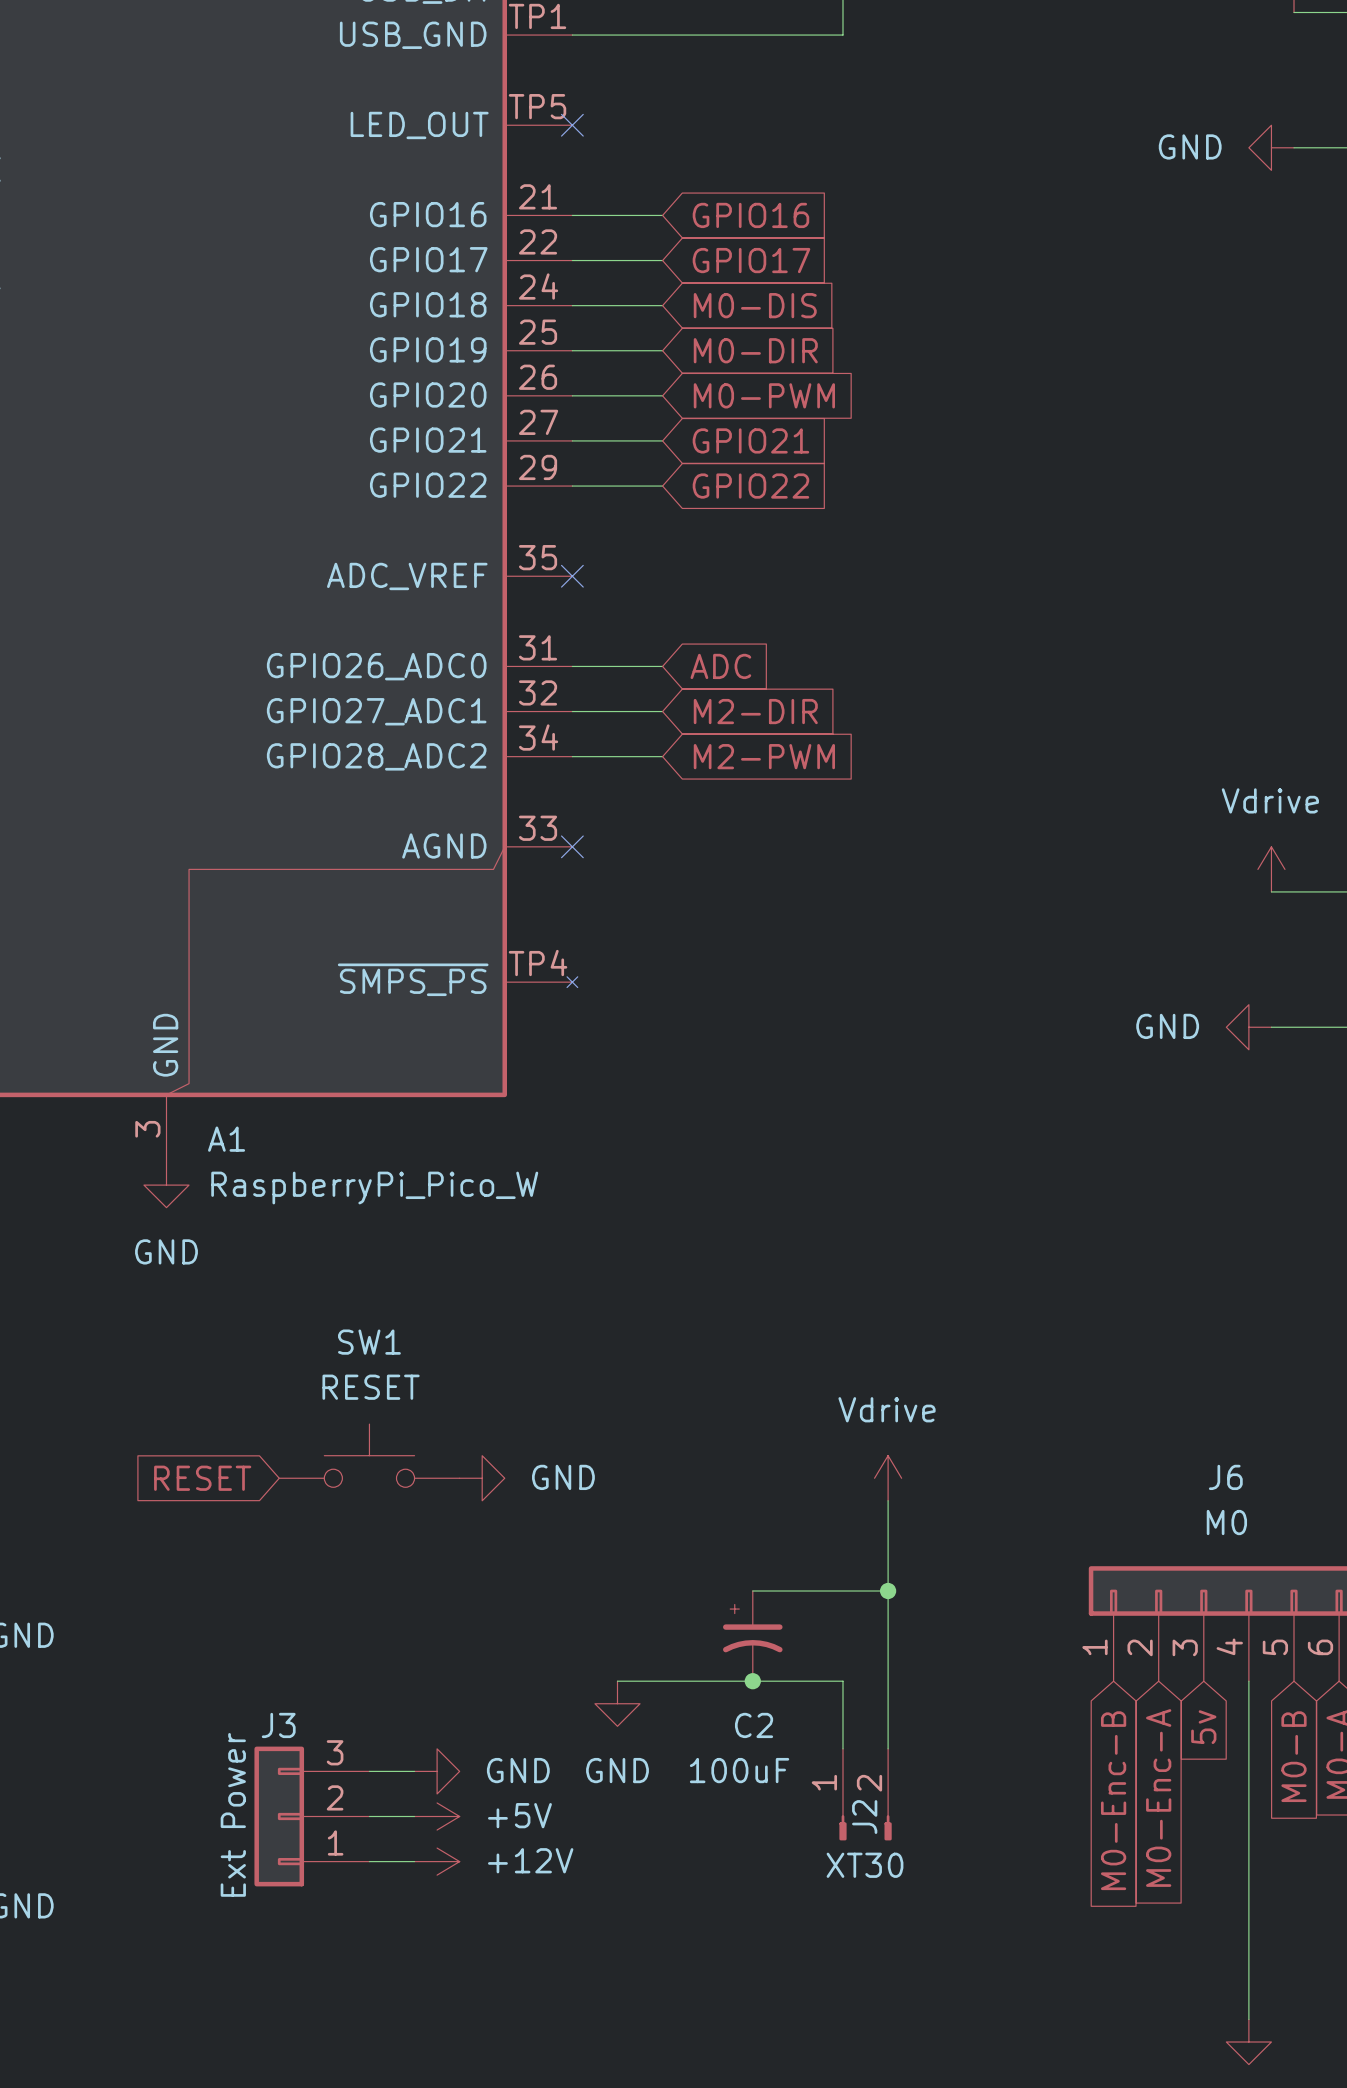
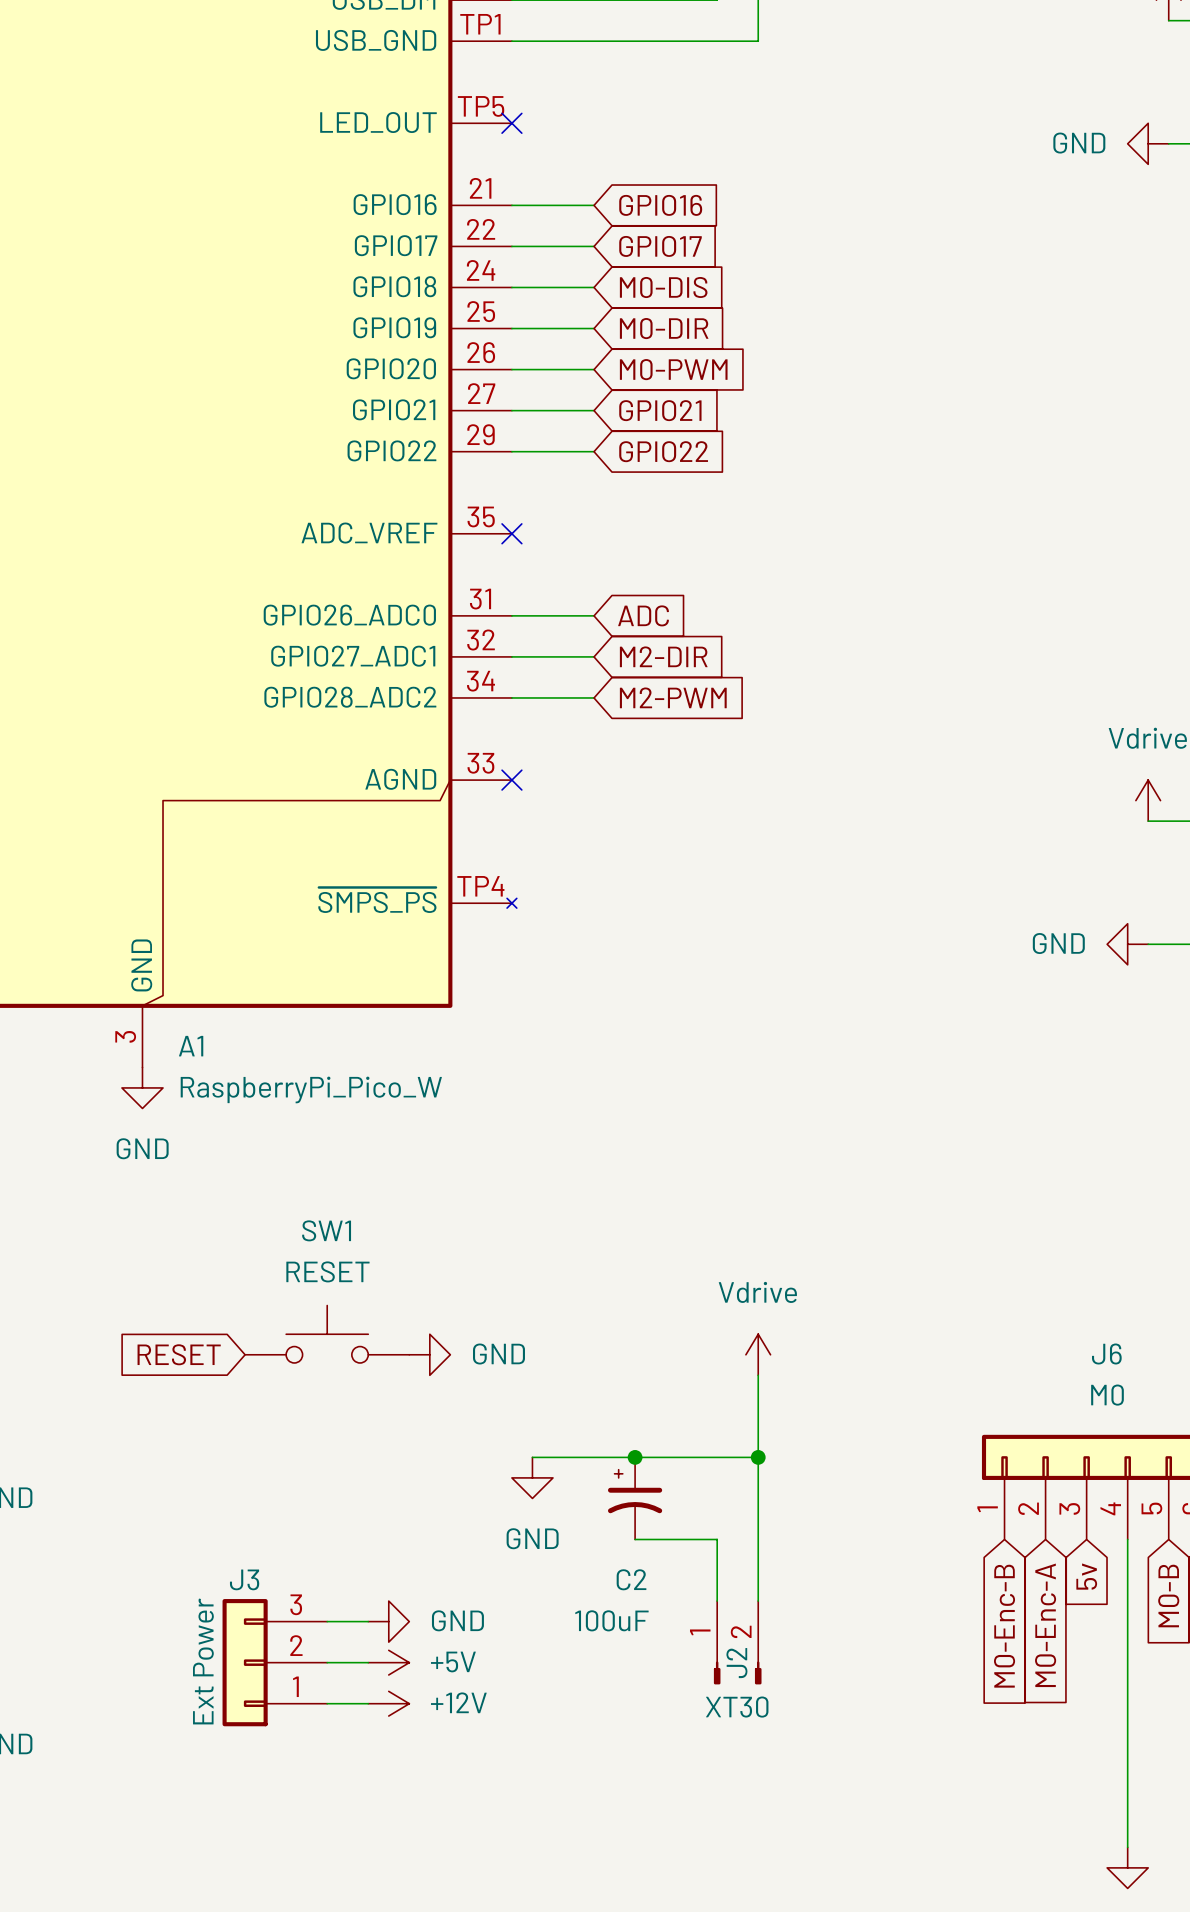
power symbol position: Vdrive (888, 1478) -> Vdrive (758, 1354)
wire: none -> (758, 1375) (758, 1539)
wire: (888, 1500) (888, 1748) -> none
wire: none -> (532, 1457) (676, 1457)
junction: none -> (635, 1457)
wire: (842, 1591) (888, 1591) -> none
junction position: (888, 1591) -> (758, 1457)
C2 position: (752, 1636) -> (635, 1498)
wire: (617, 1681) (707, 1681) -> none
junction: (752, 1681) -> none
wire: (797, 1681) (842, 1681) -> (717, 1539) (717, 1601)
power symbol position: GND (617, 1703) -> GND (532, 1477)
J2 position: (865, 1794) -> (737, 1642)

